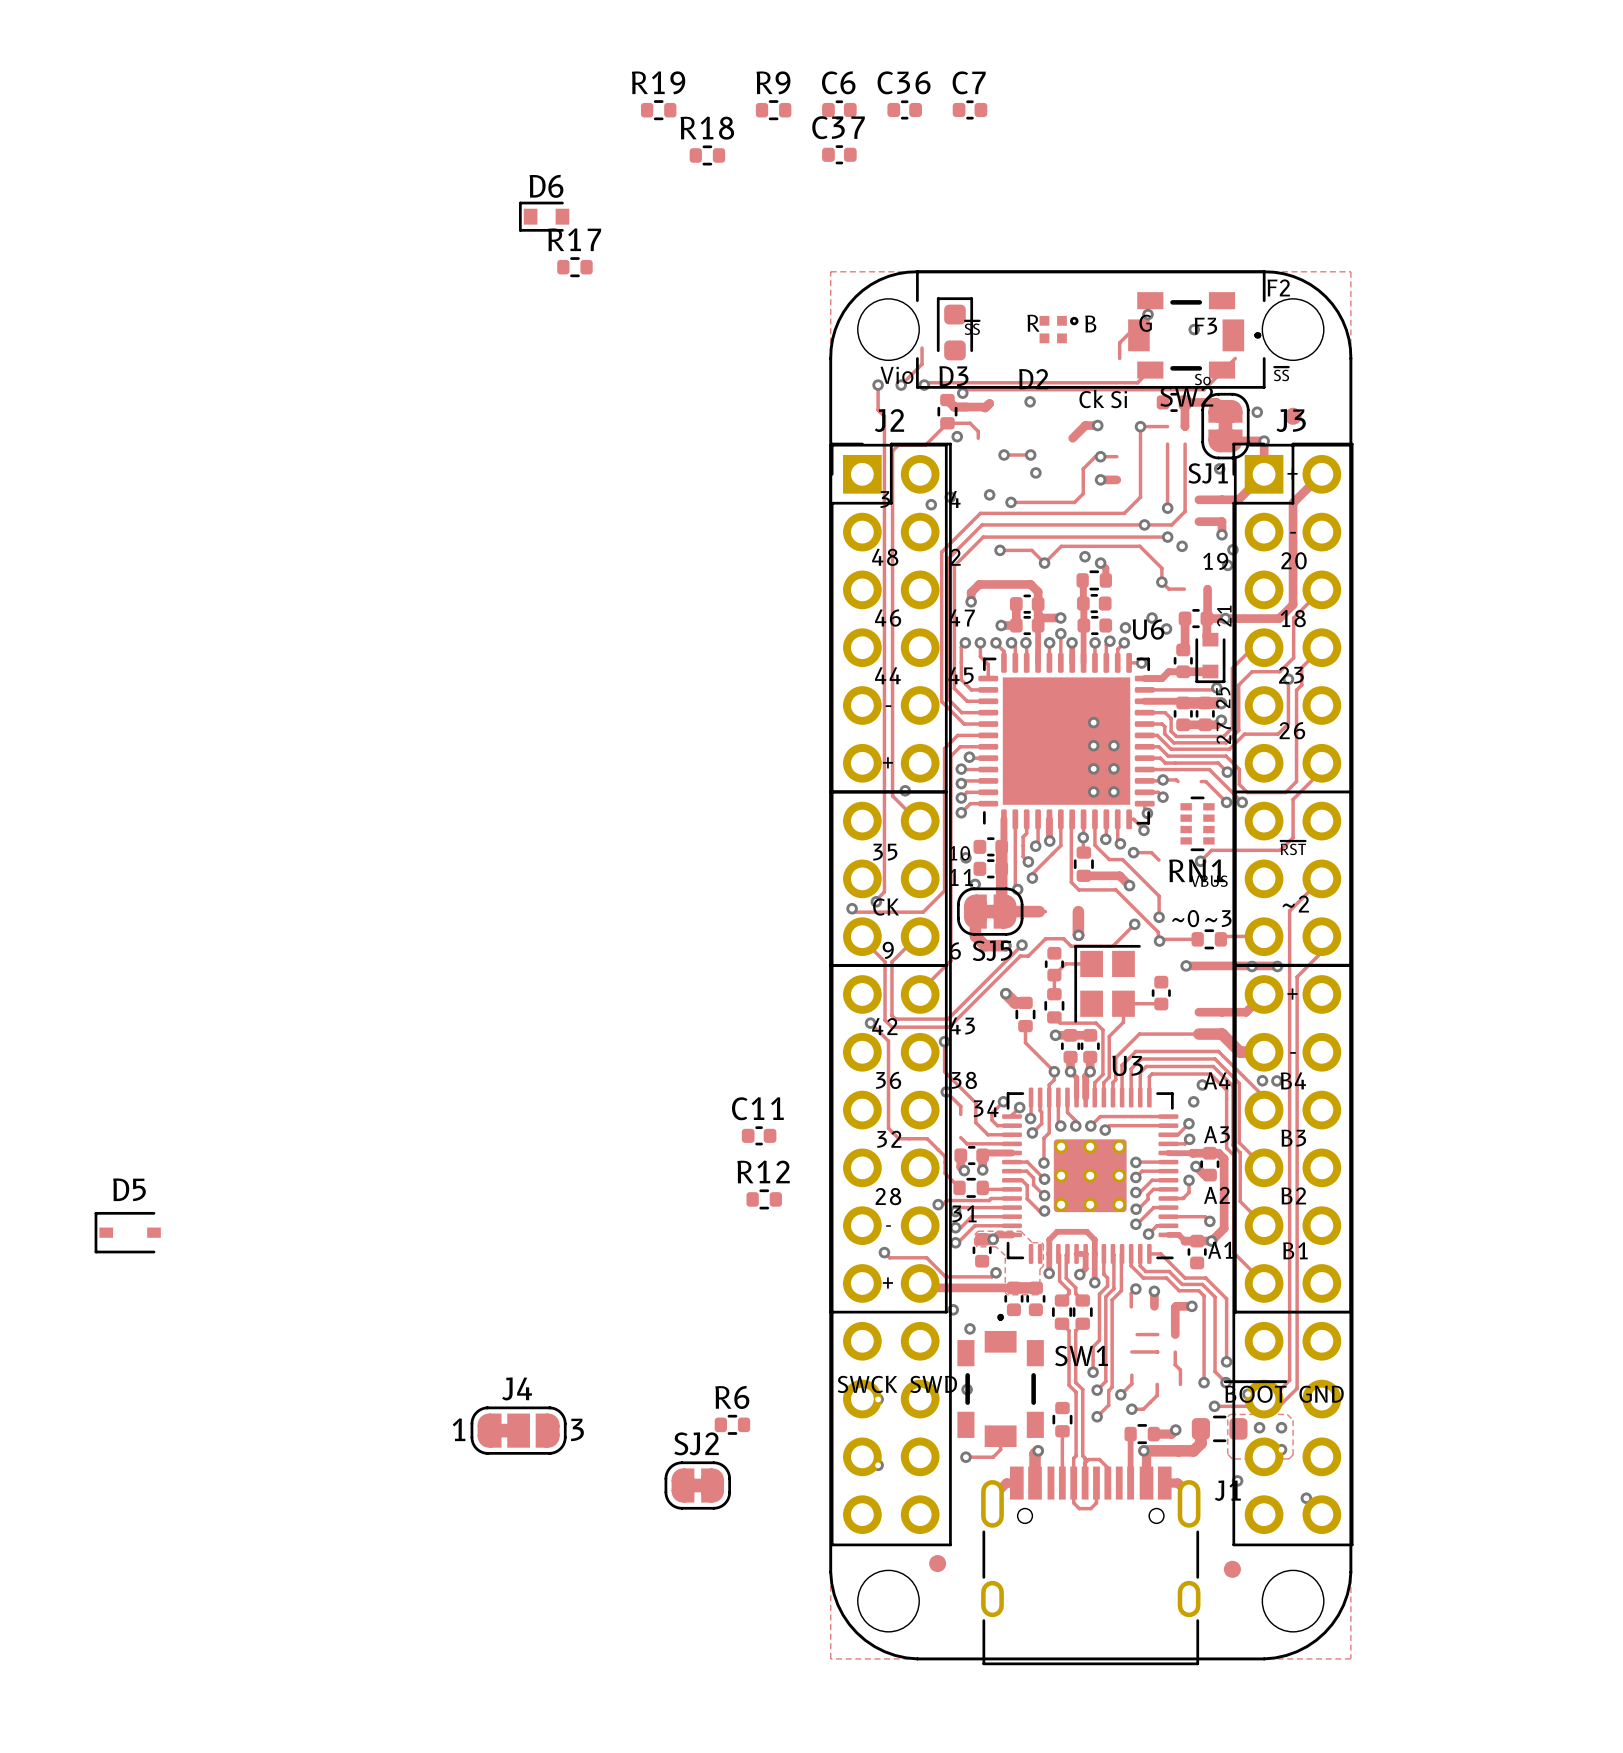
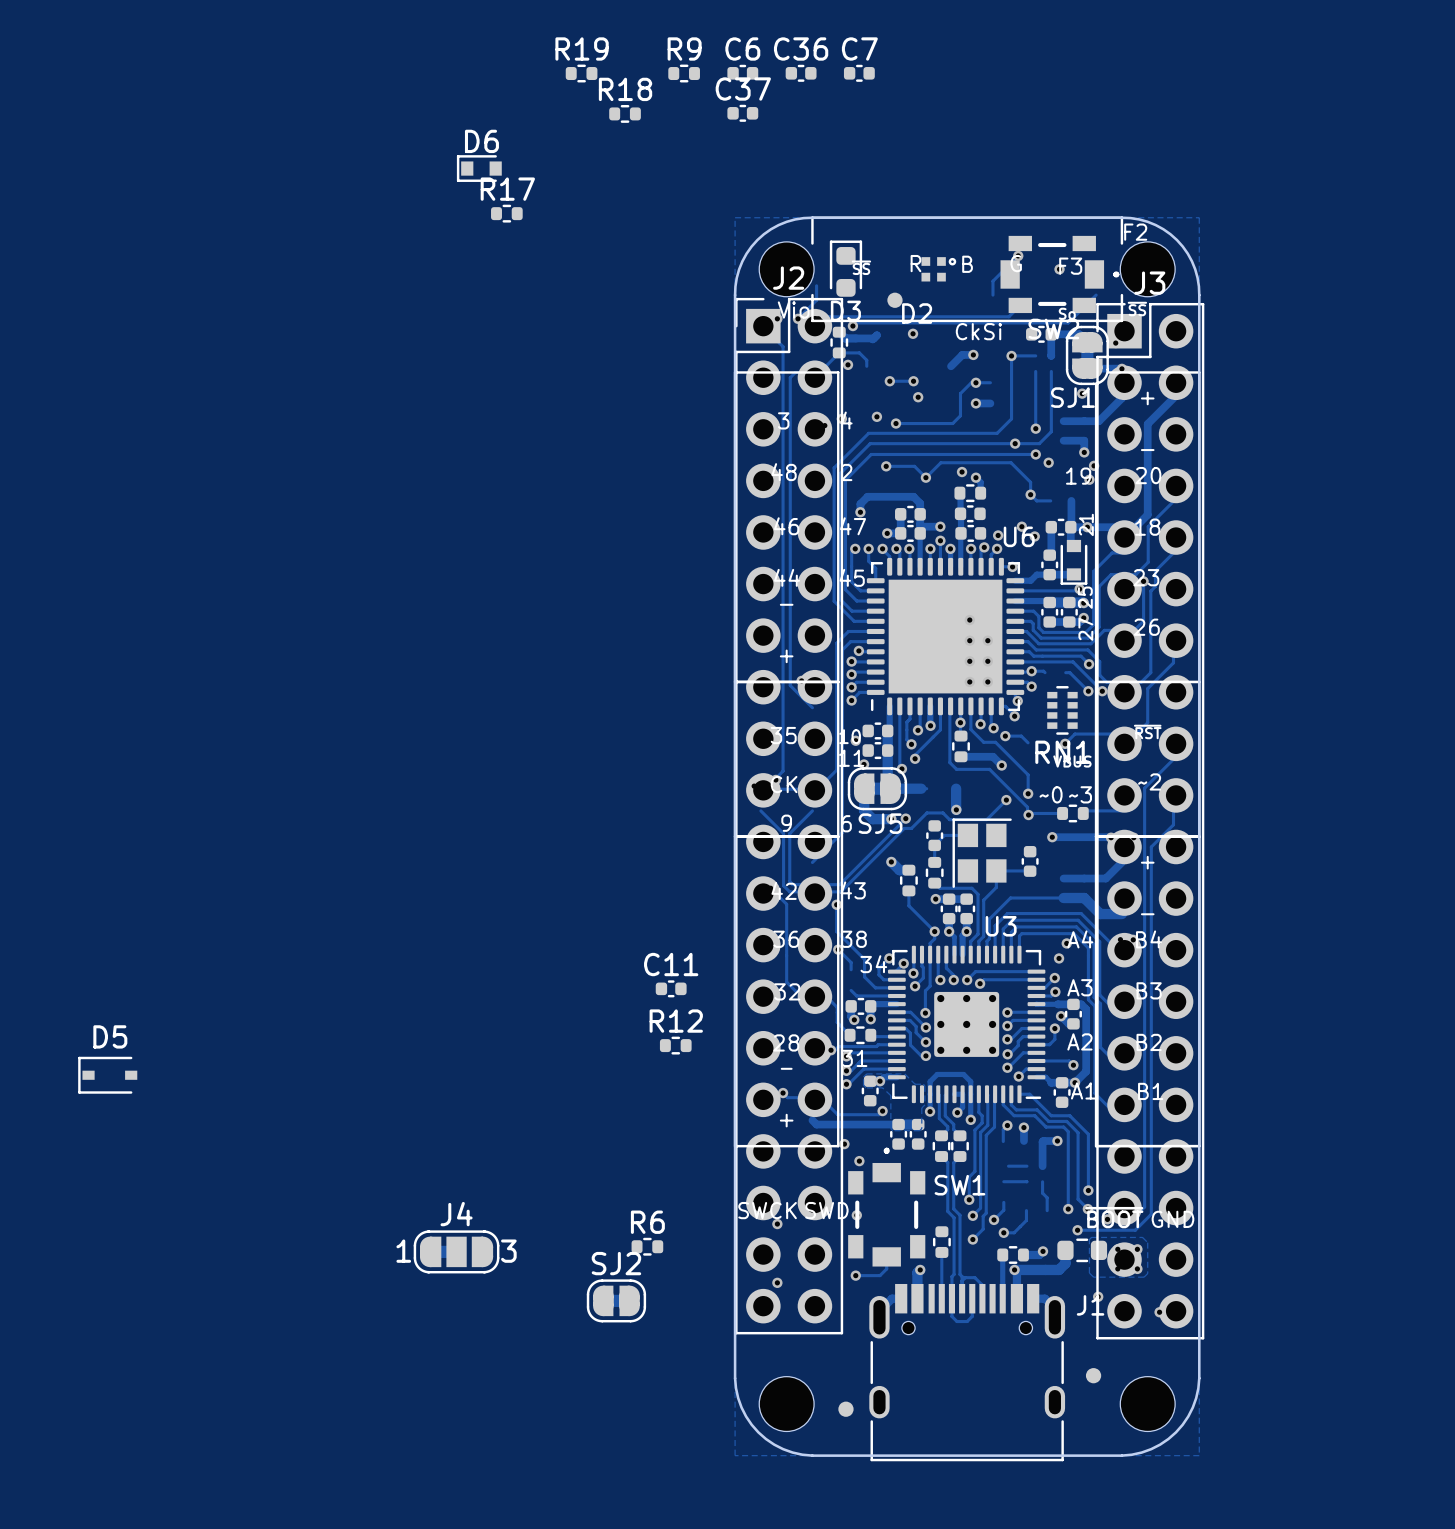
part position: (1293, 416) -> (894, 300)
J2 footprint: [830, 442, 952, 1547] -> [735, 297, 844, 1335]
J3 footprint: [1232, 442, 1354, 1547] -> [1096, 302, 1205, 1340]
part position: (937, 1563) -> (845, 1409)

